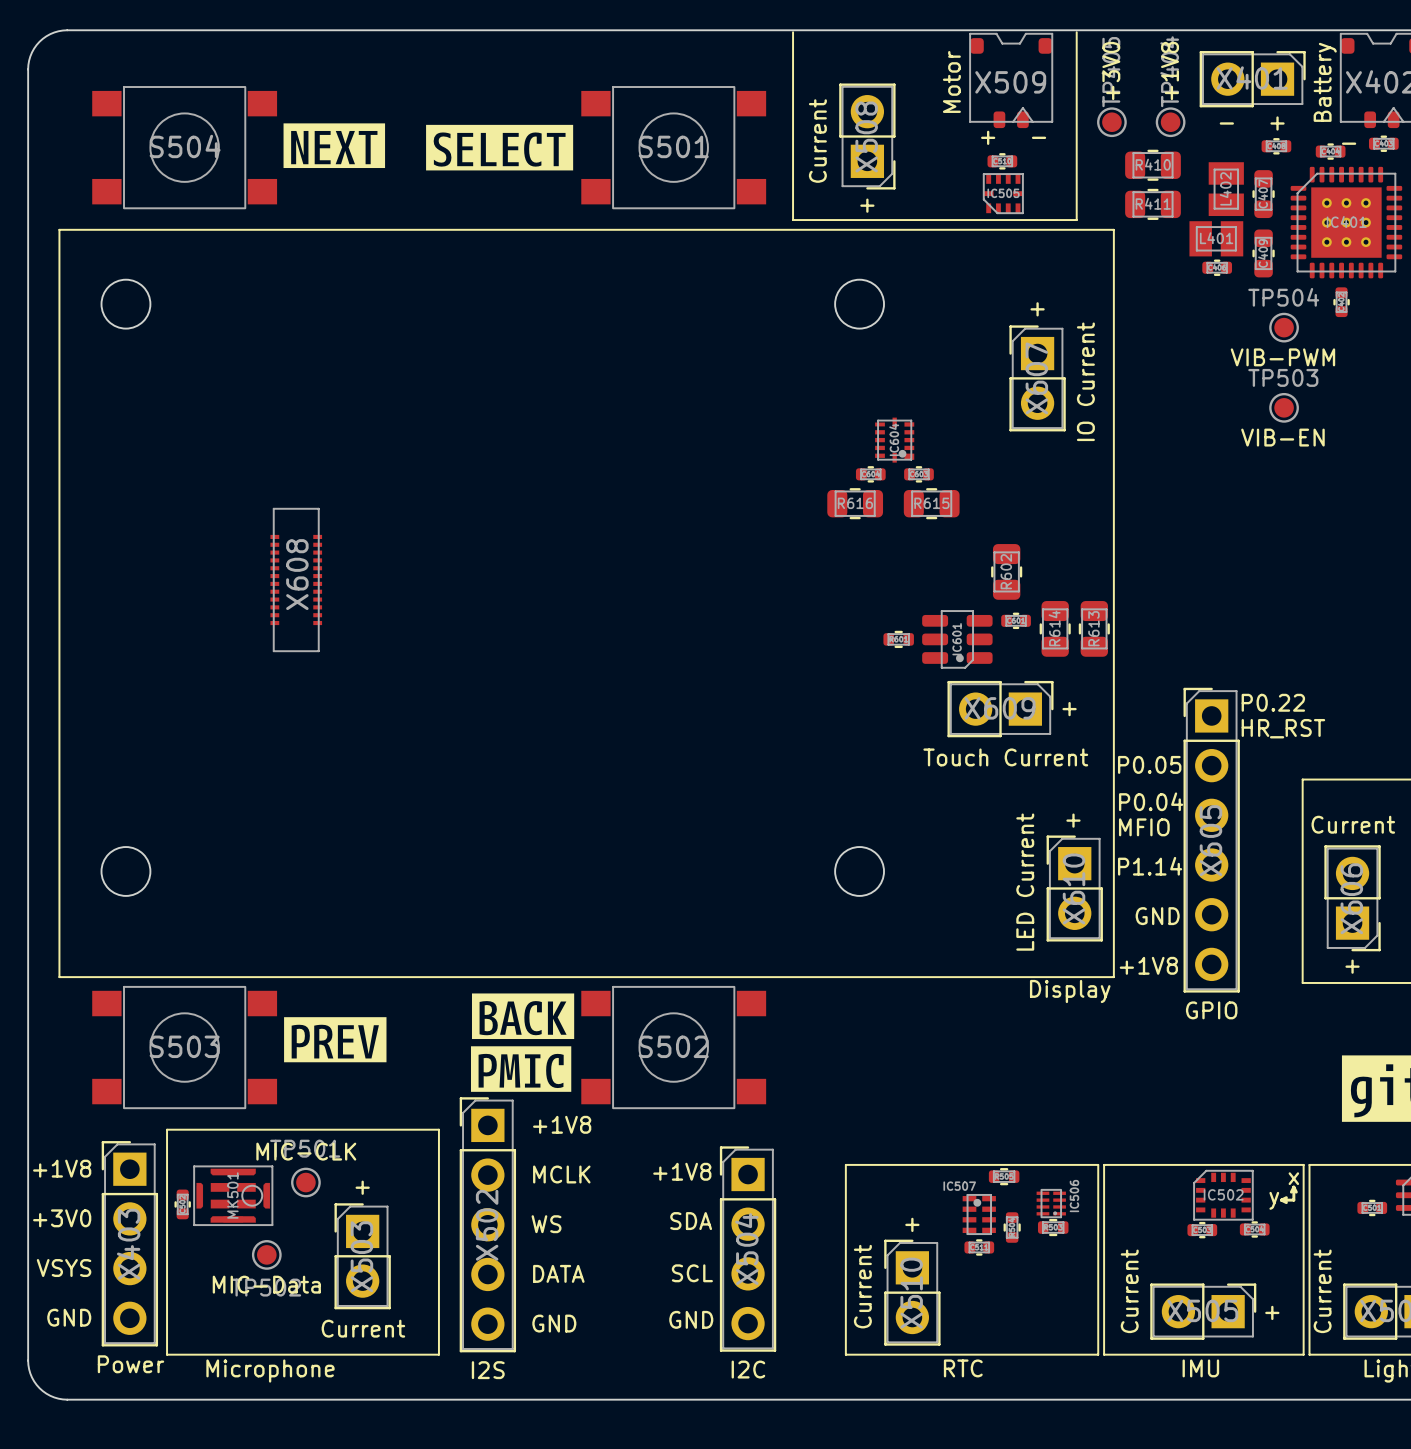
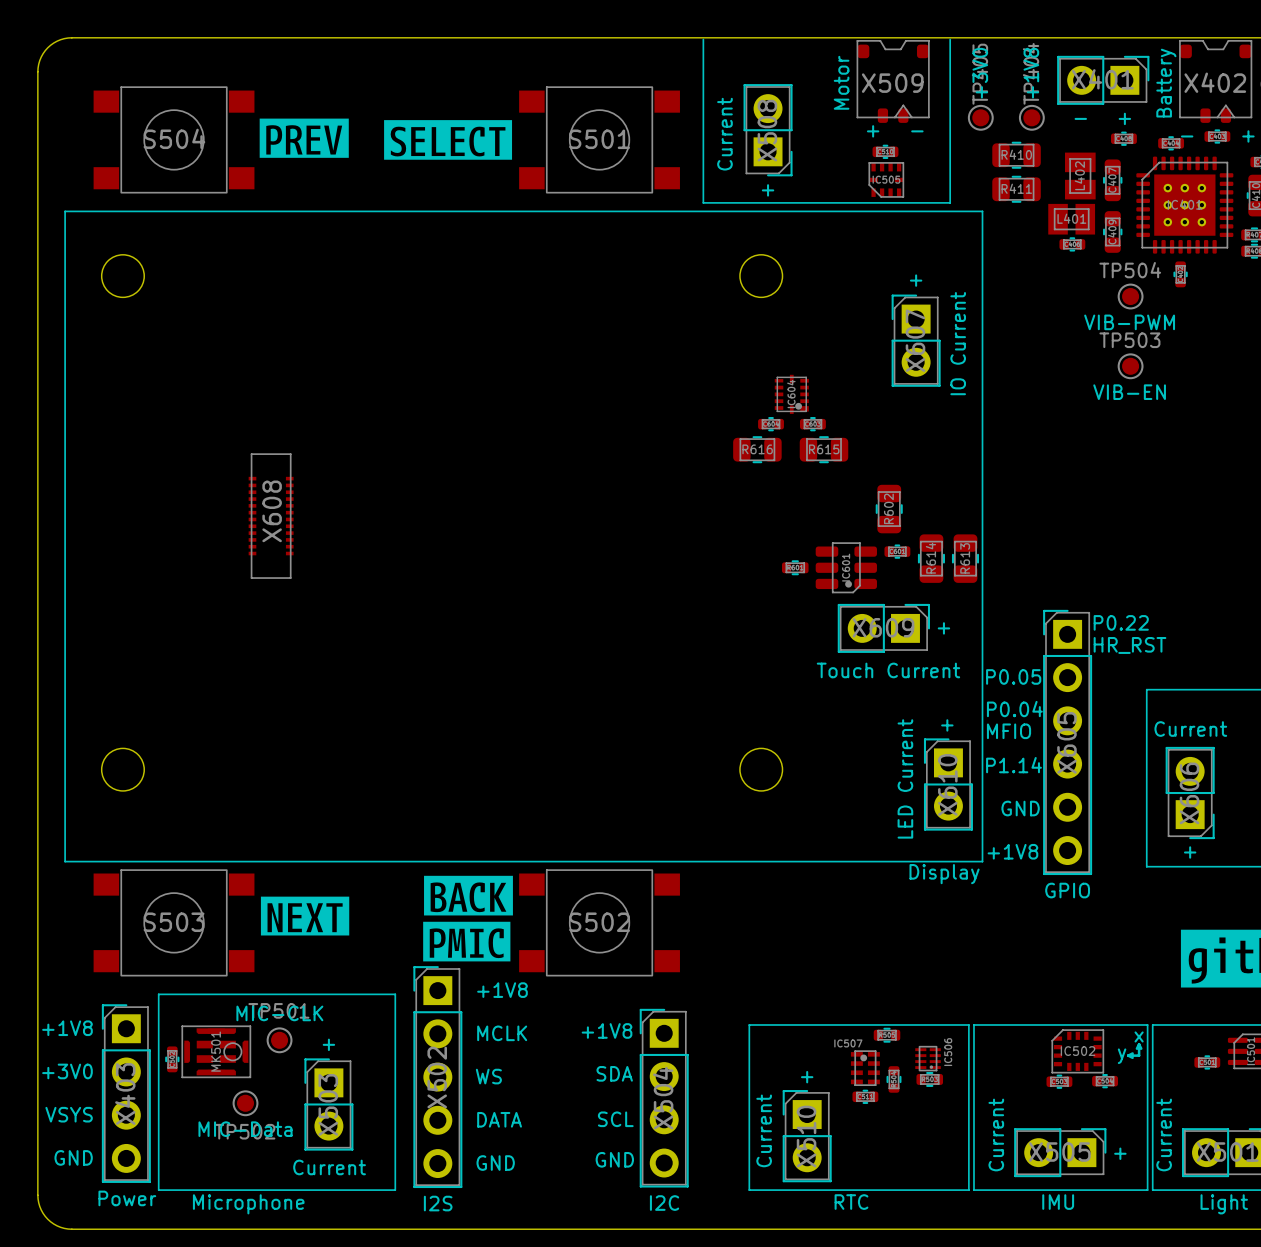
drawing shape: [283, 123, 386, 169] -> [259, 118, 349, 158]
drawing shape: [284, 1017, 387, 1063] -> [260, 896, 350, 936]

